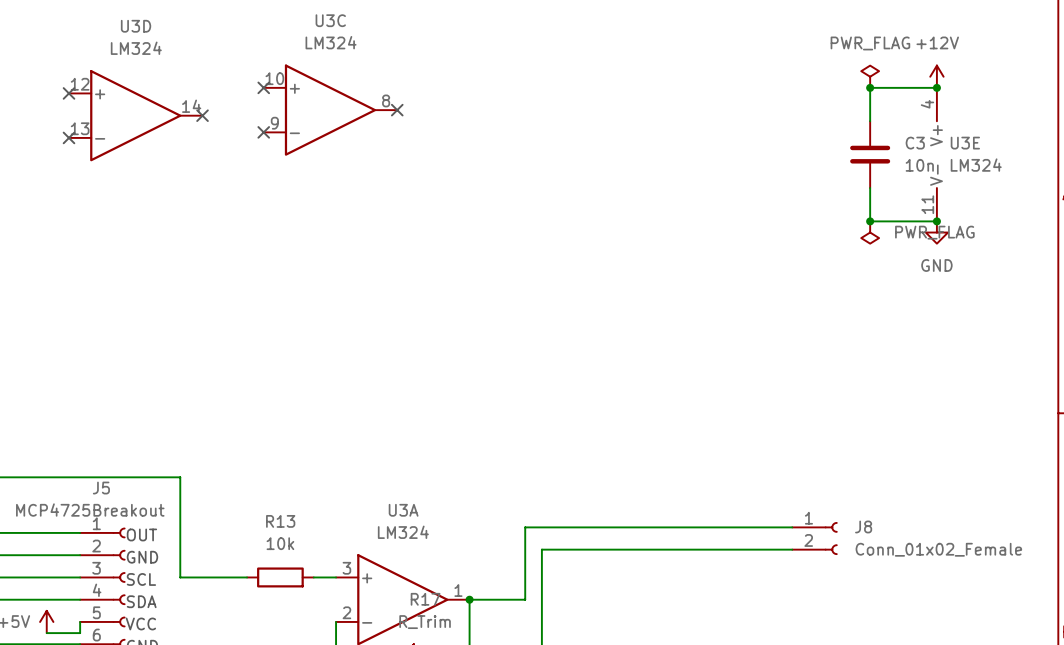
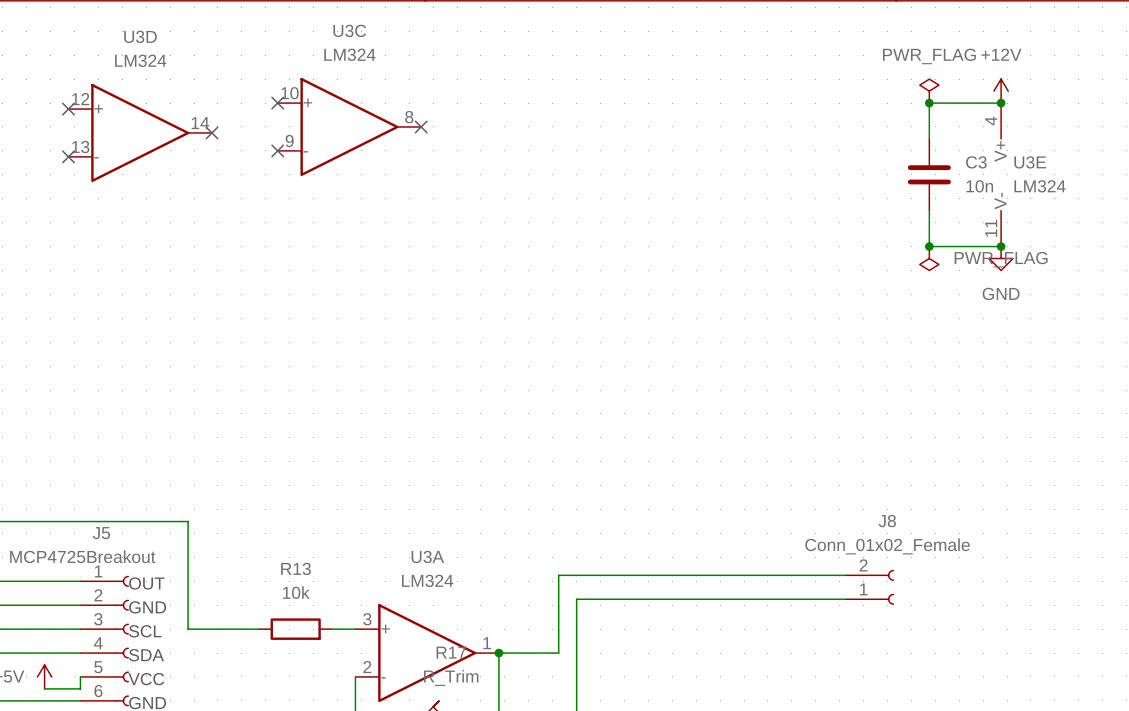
J8 name position: J8 (863, 526) -> J8 (887, 521)
J8 flip: as is (831, 538) -> up-down (887, 587)
J8 value position: Conn_01x02_Female (938, 549) -> Conn_01x02_Female (887, 546)

